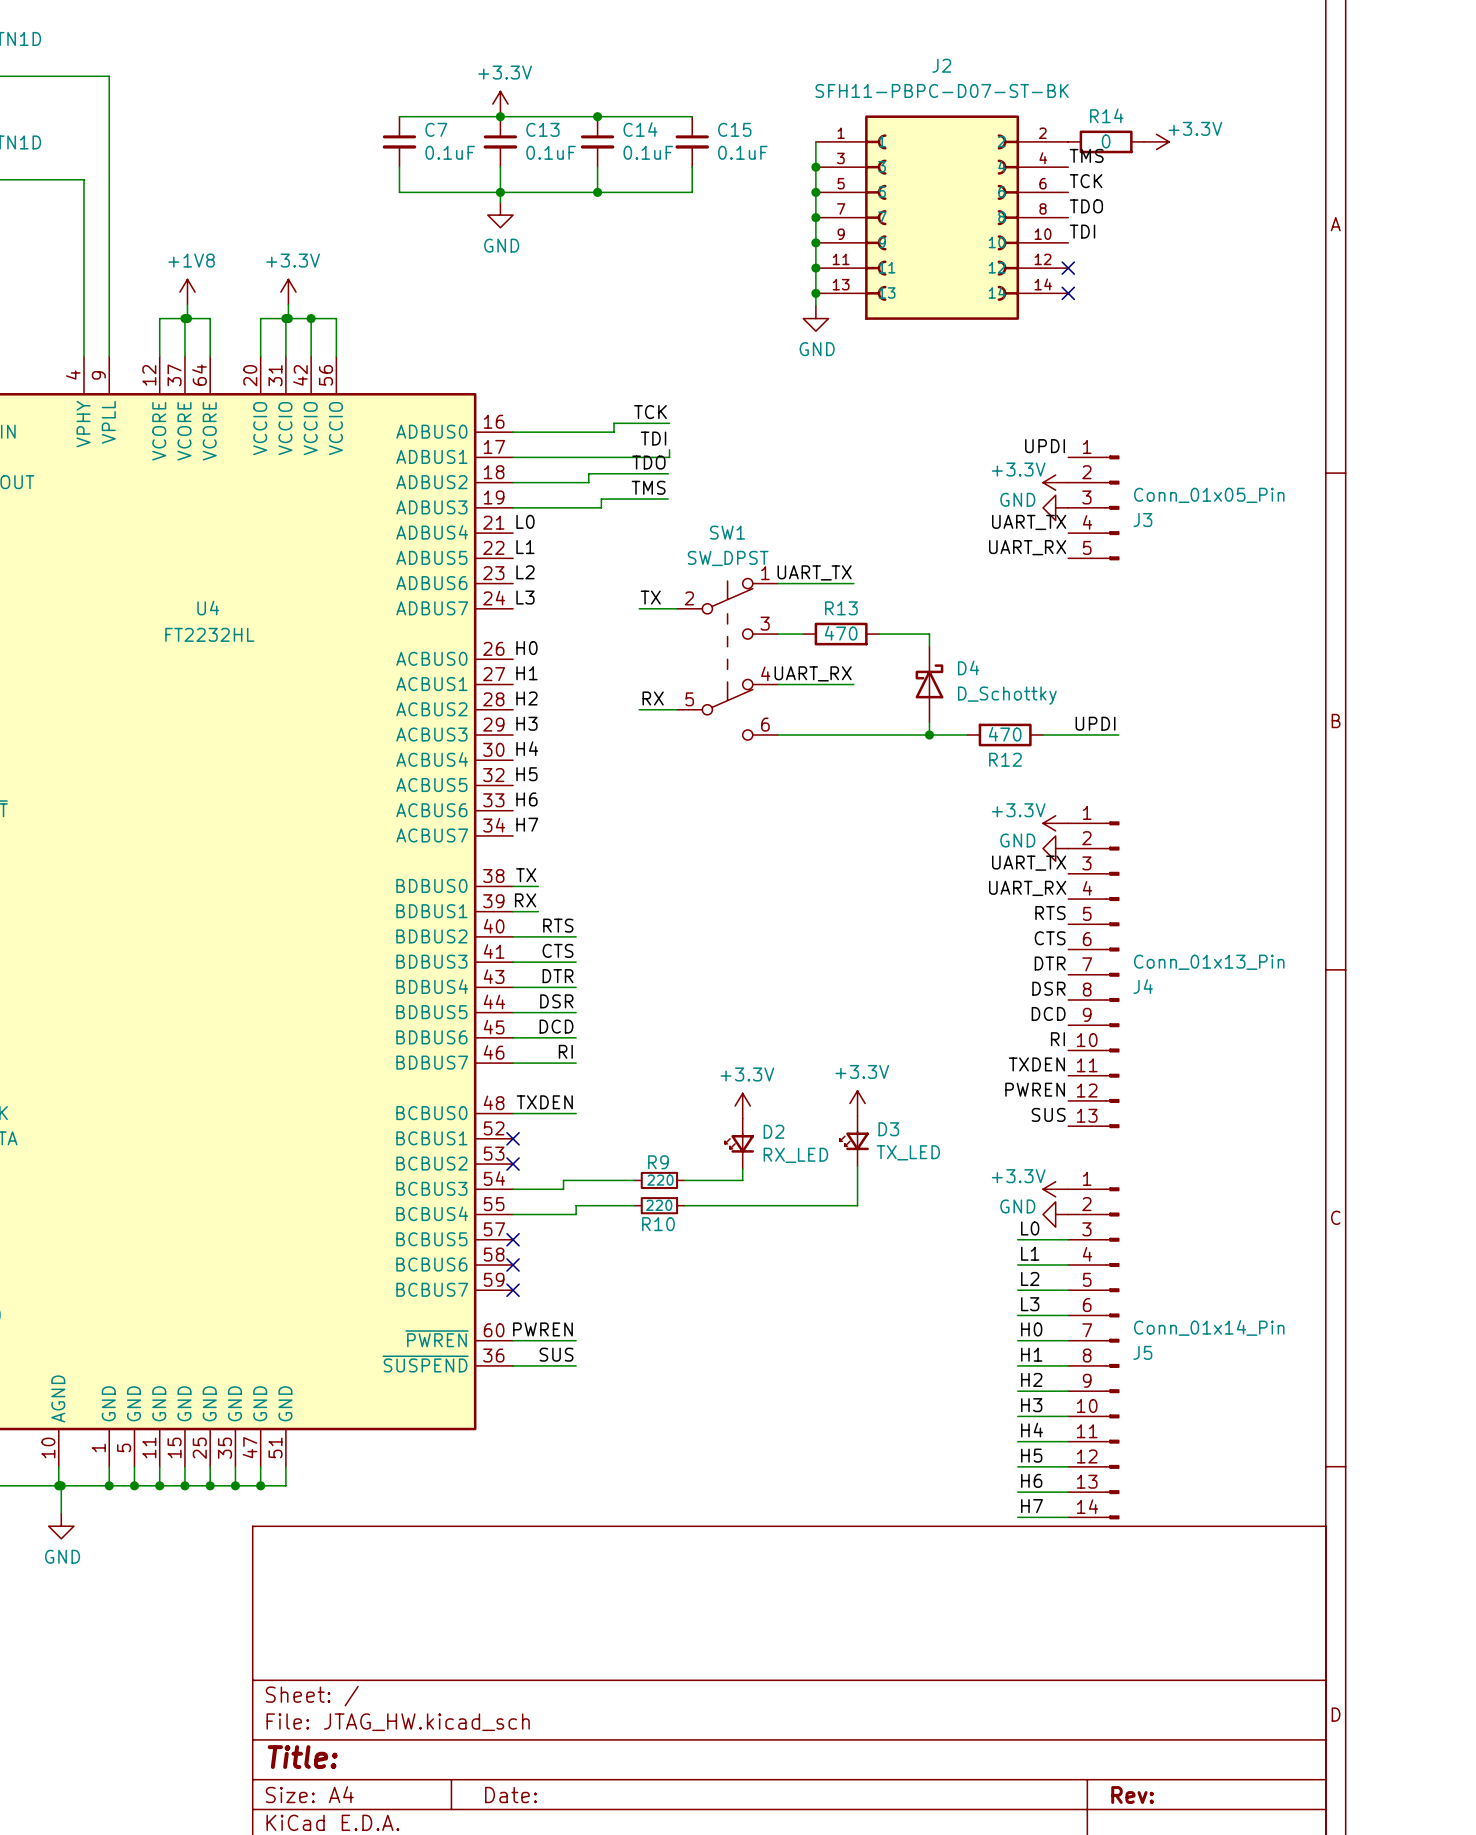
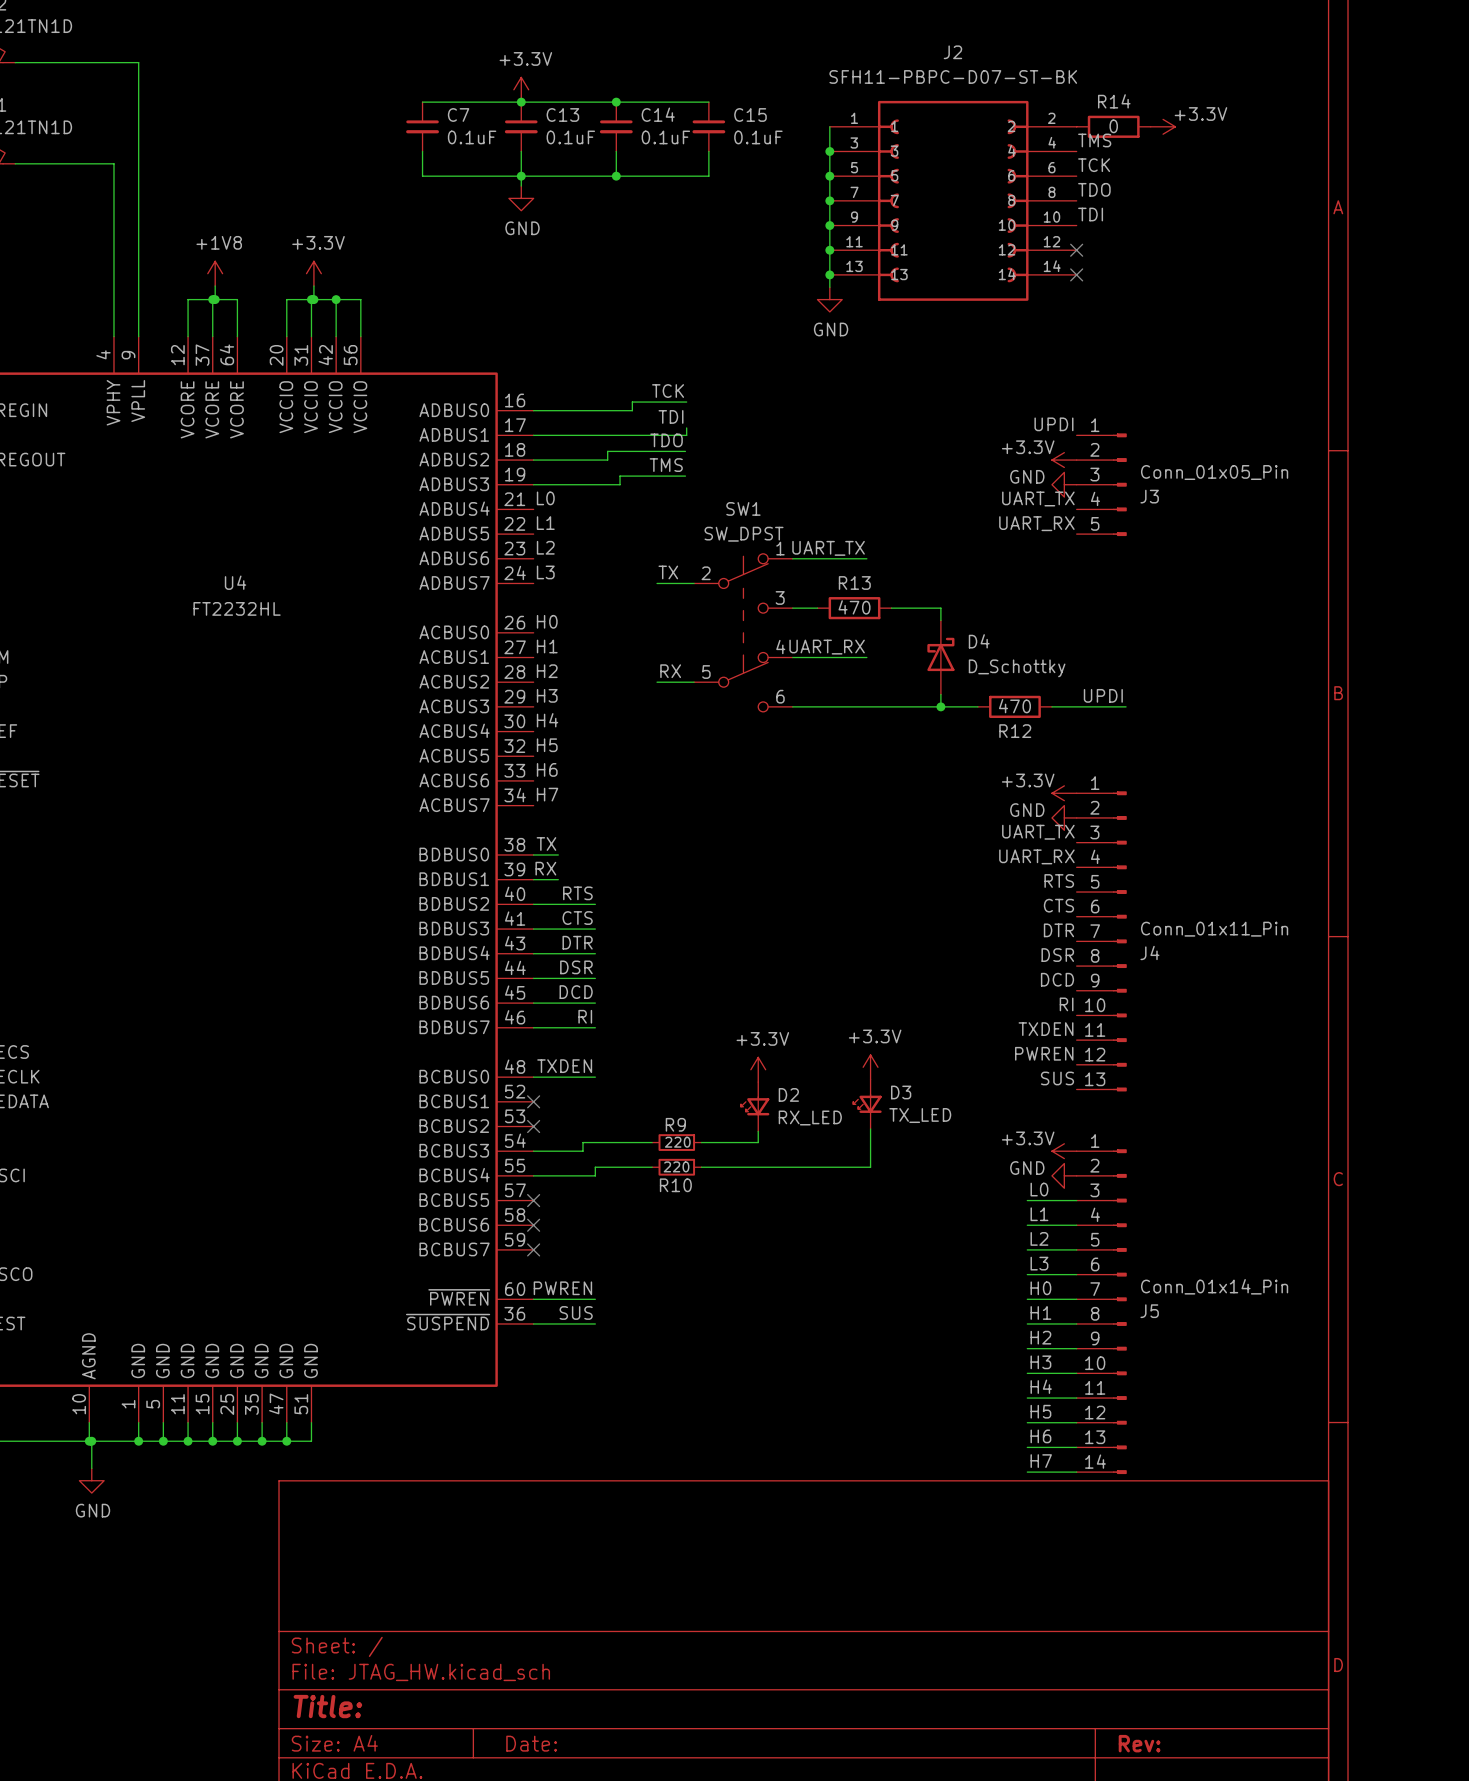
J4 value: Conn_01x13_Pin (1209, 962) -> Conn_01x11_Pin (1214, 929)

